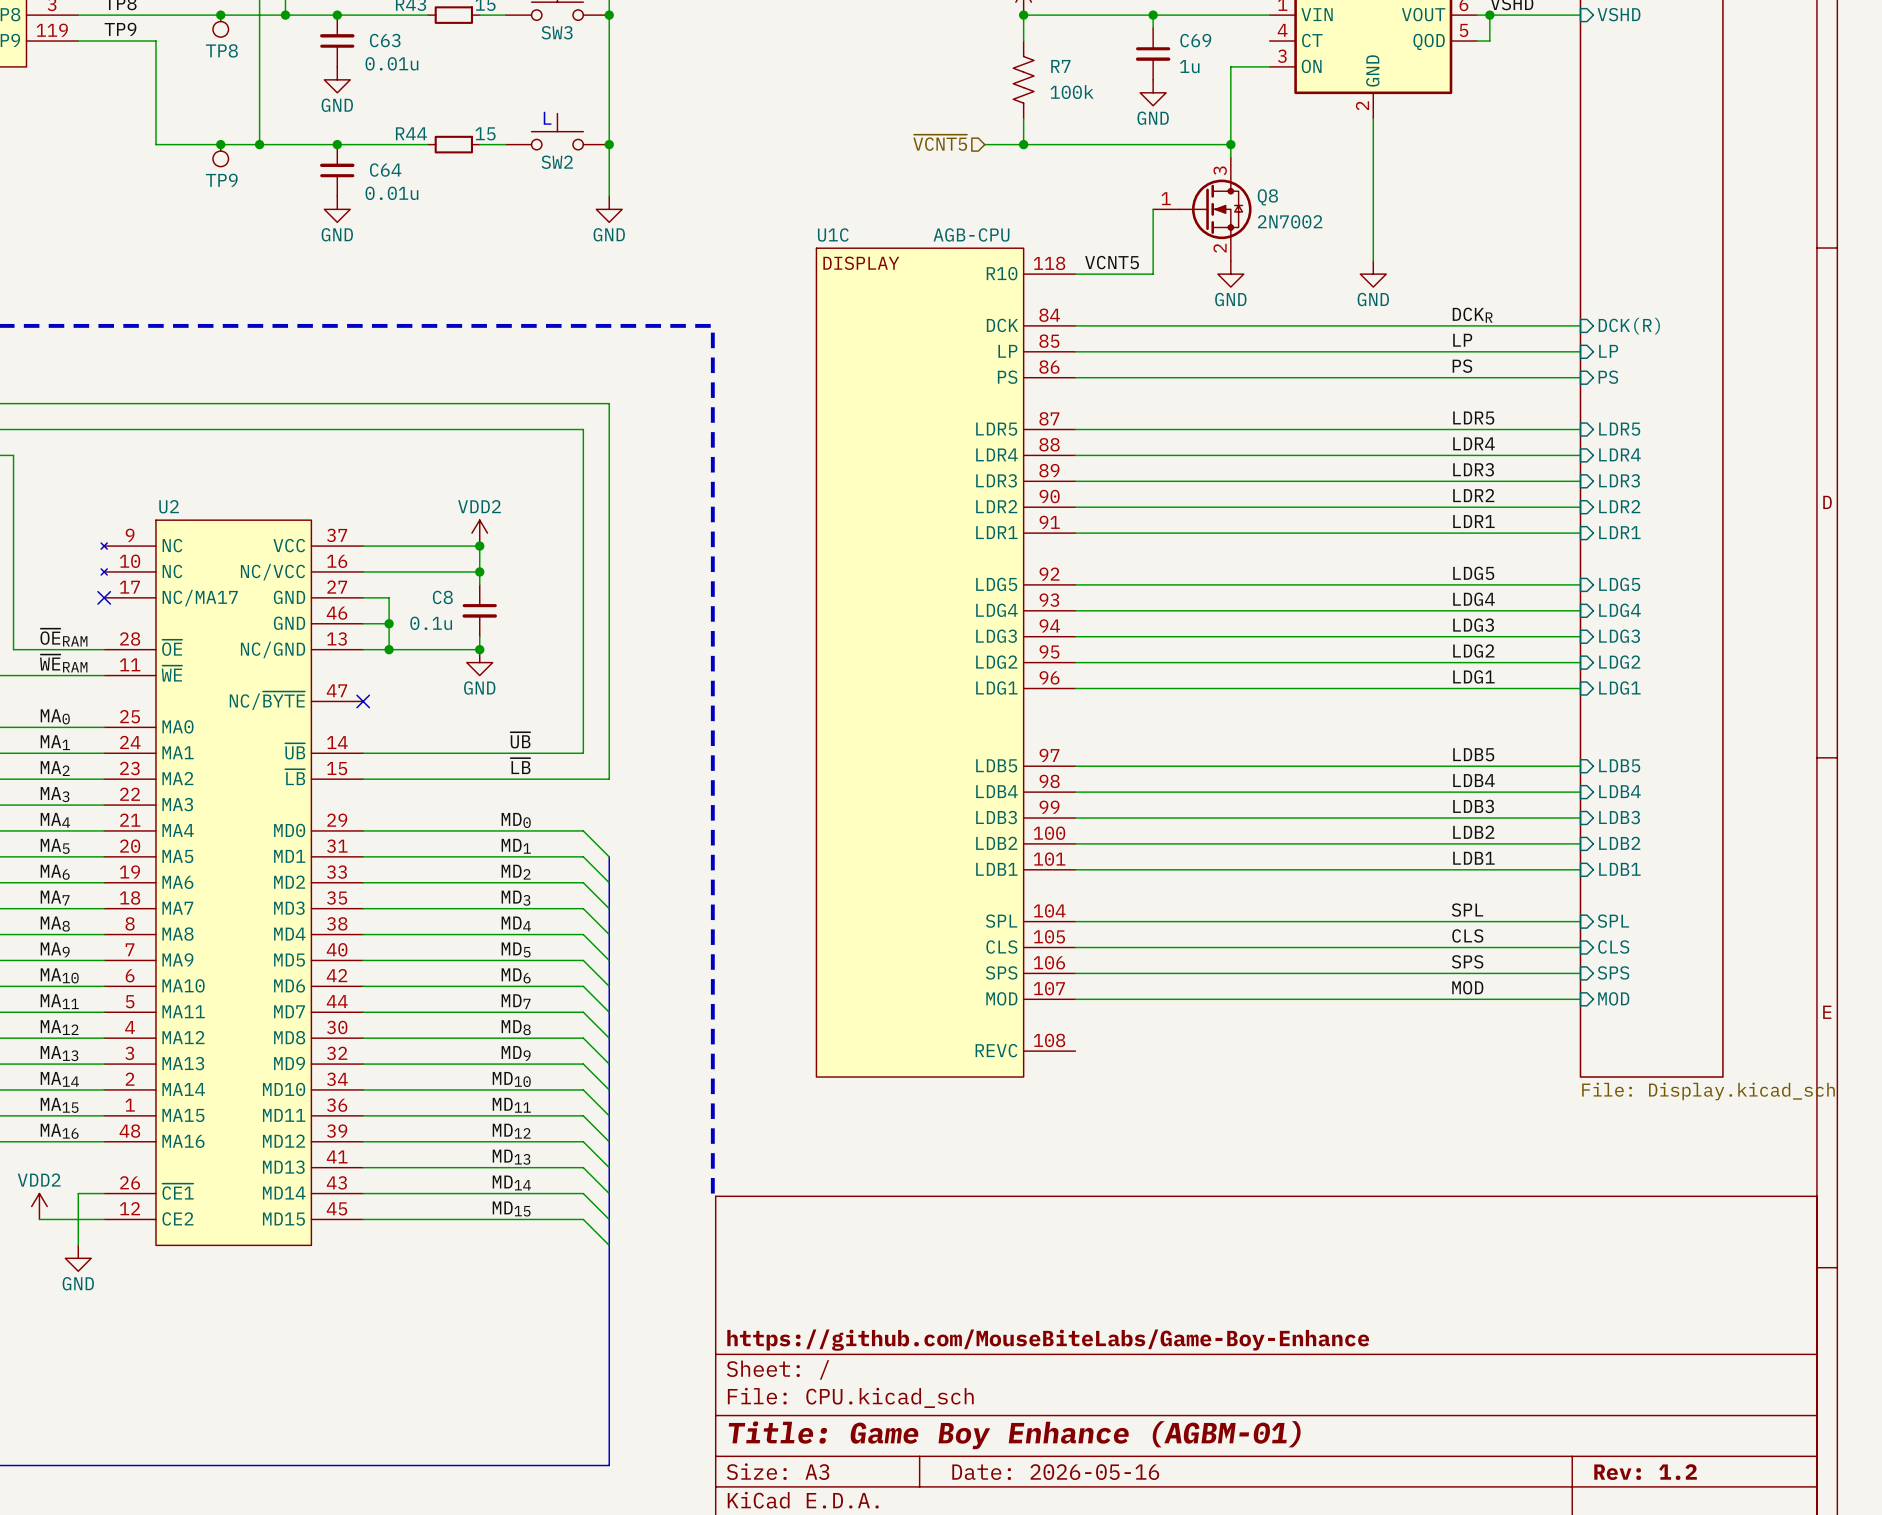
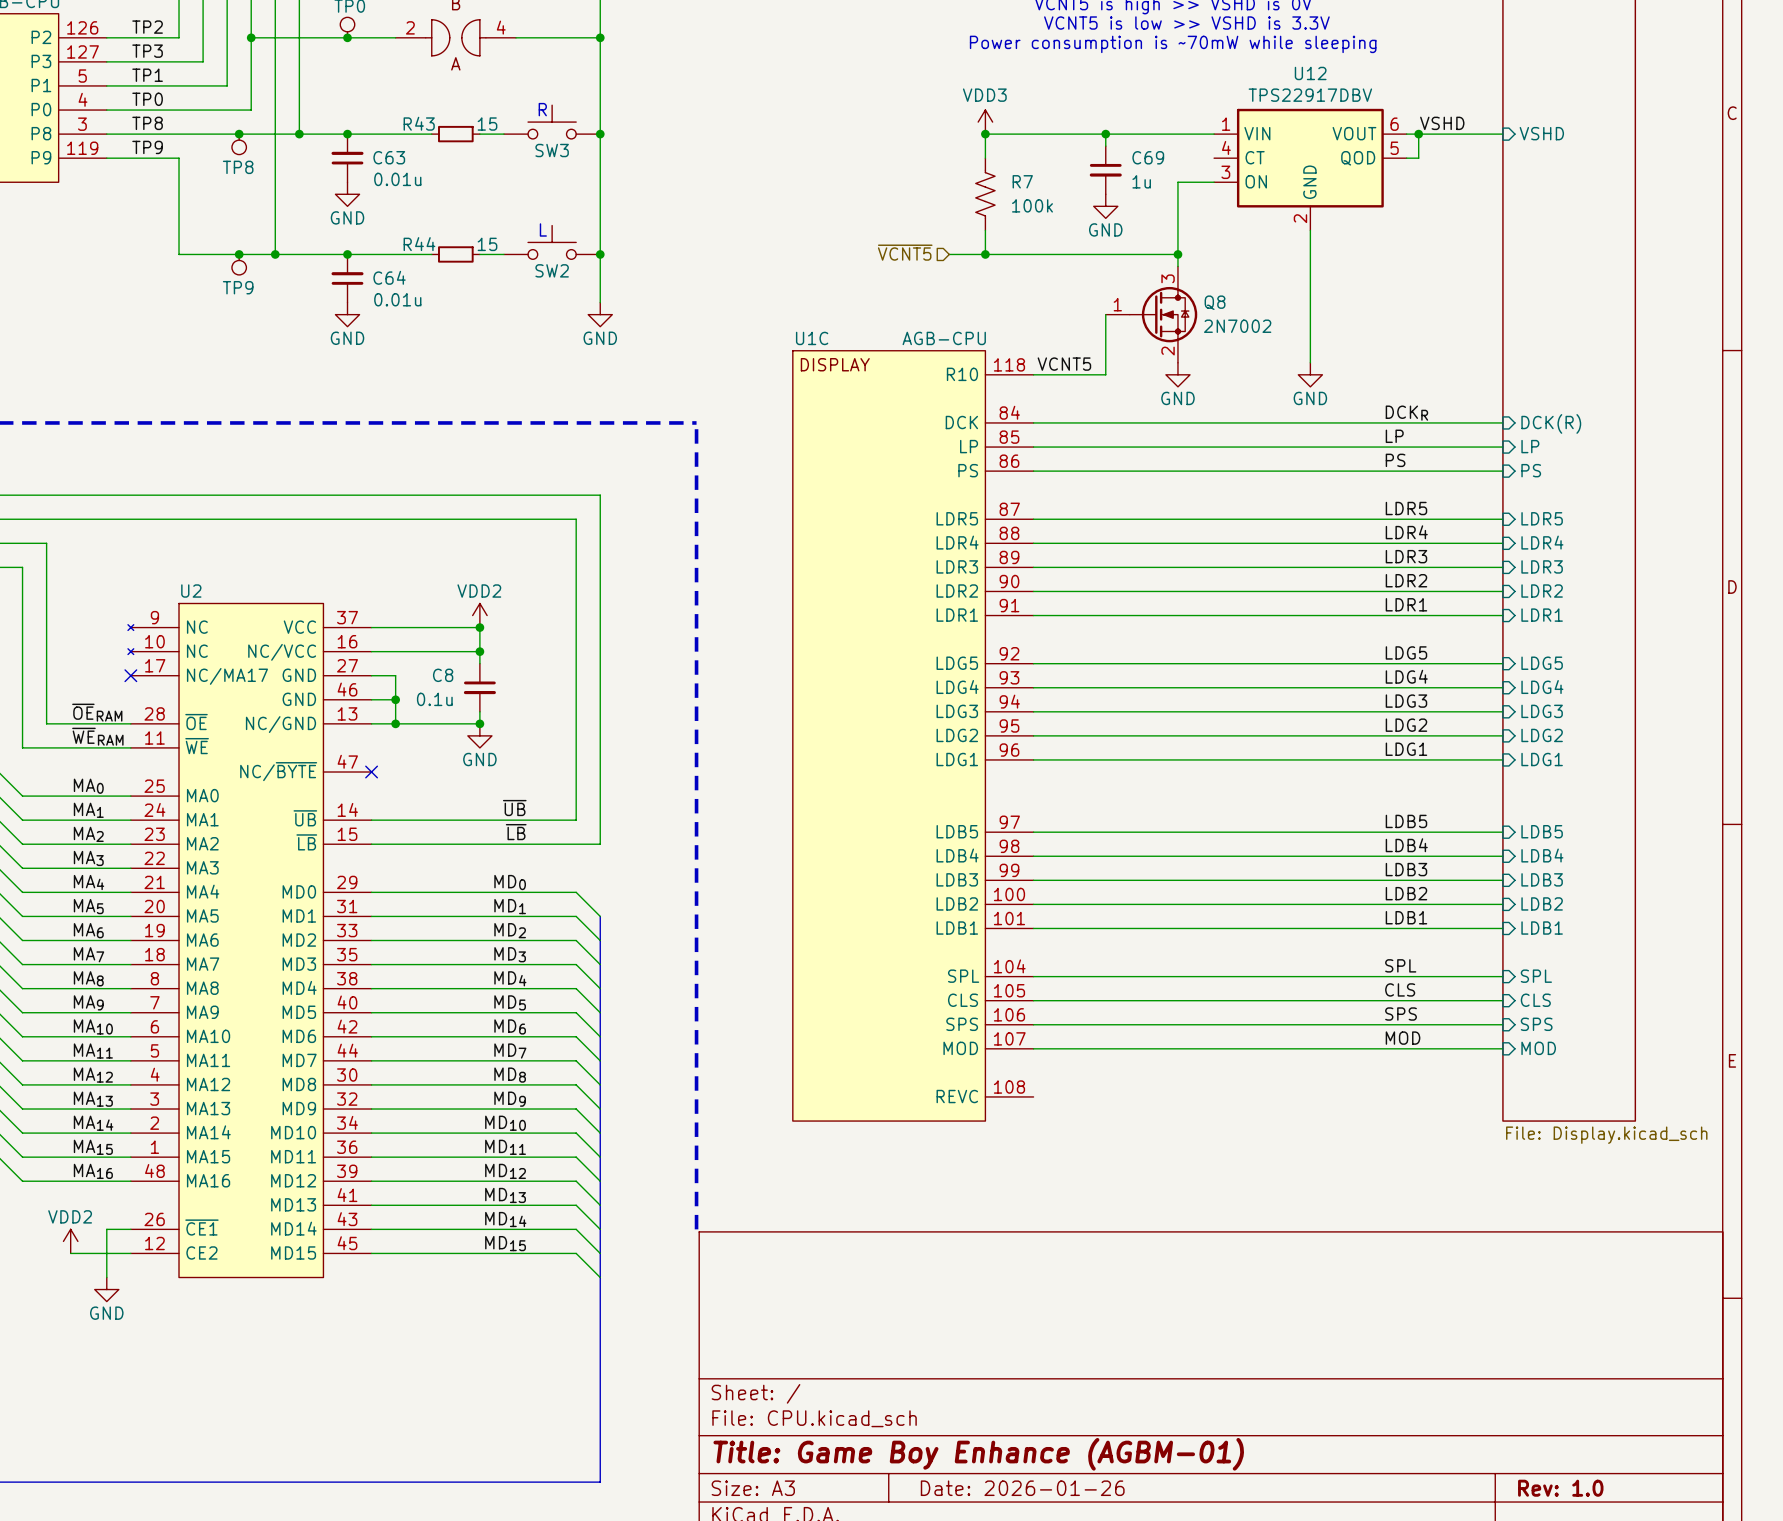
title block: https://github.com/MouseBiteLabs/Game-Boy-Enhance (1048, 1340) -> none
title block: Date: 2026-05-16 (1055, 1472) -> Date: 2026-01-26 (1022, 1488)
title block: Rev: 1.2 (1645, 1472) -> Rev: 1.0 (1560, 1488)

